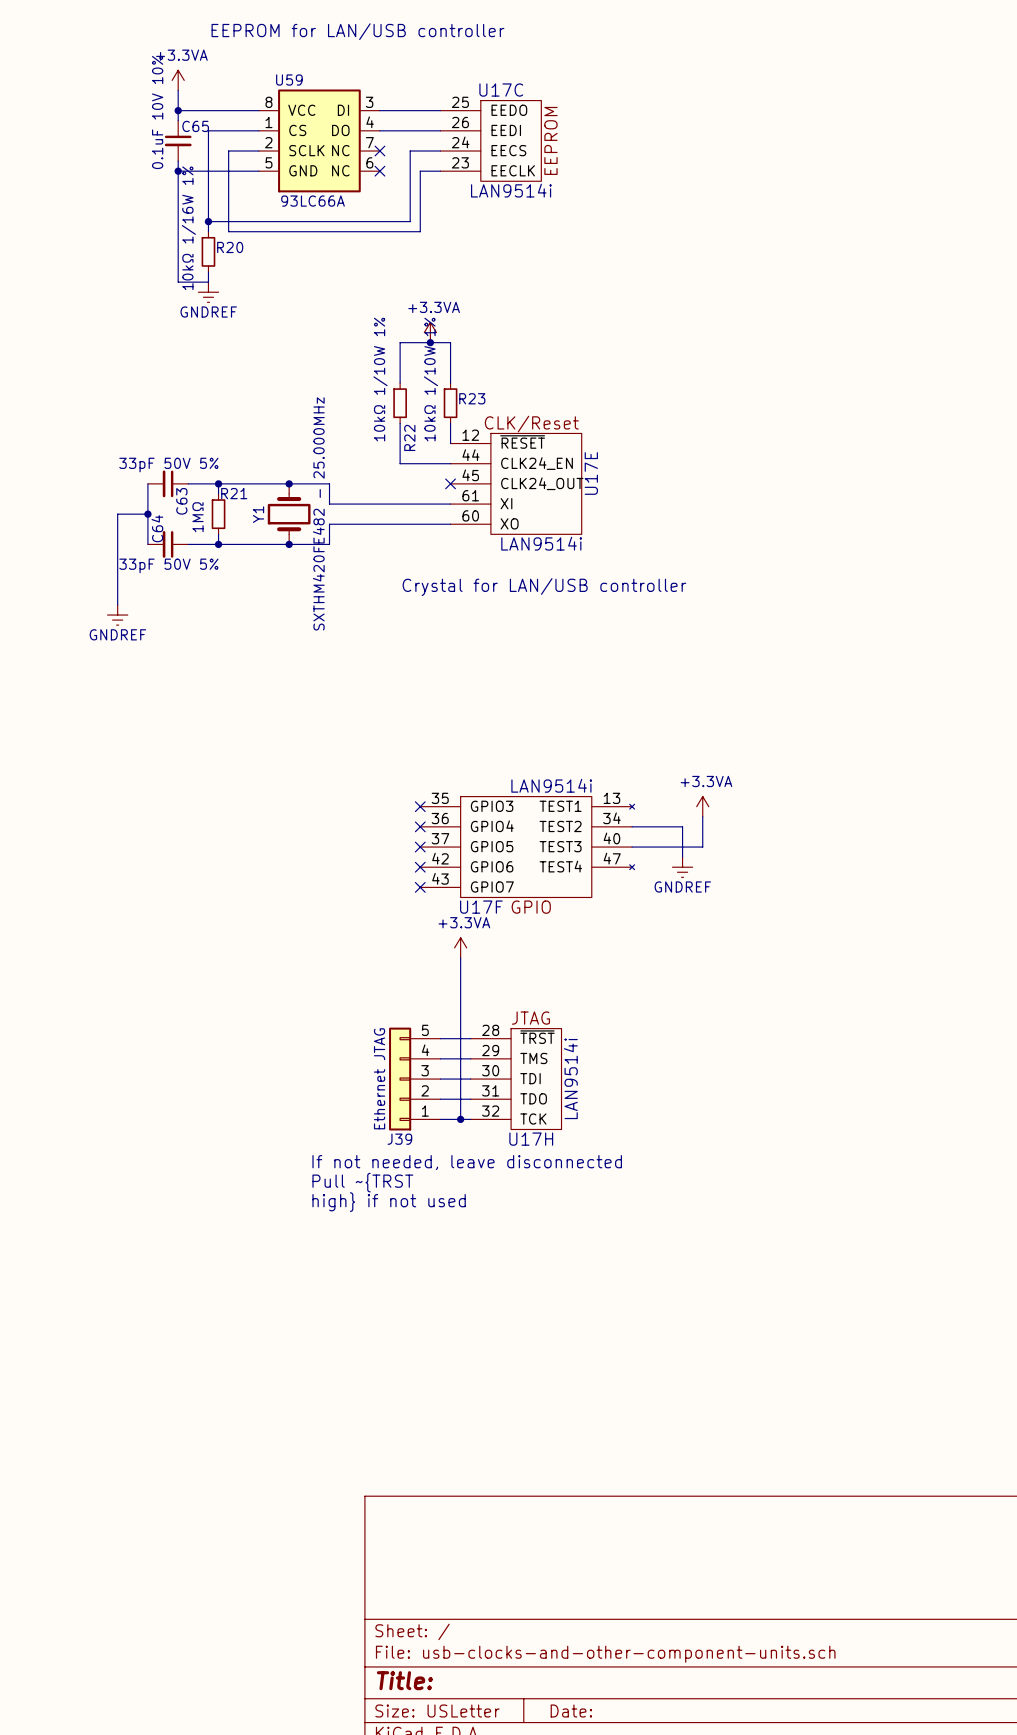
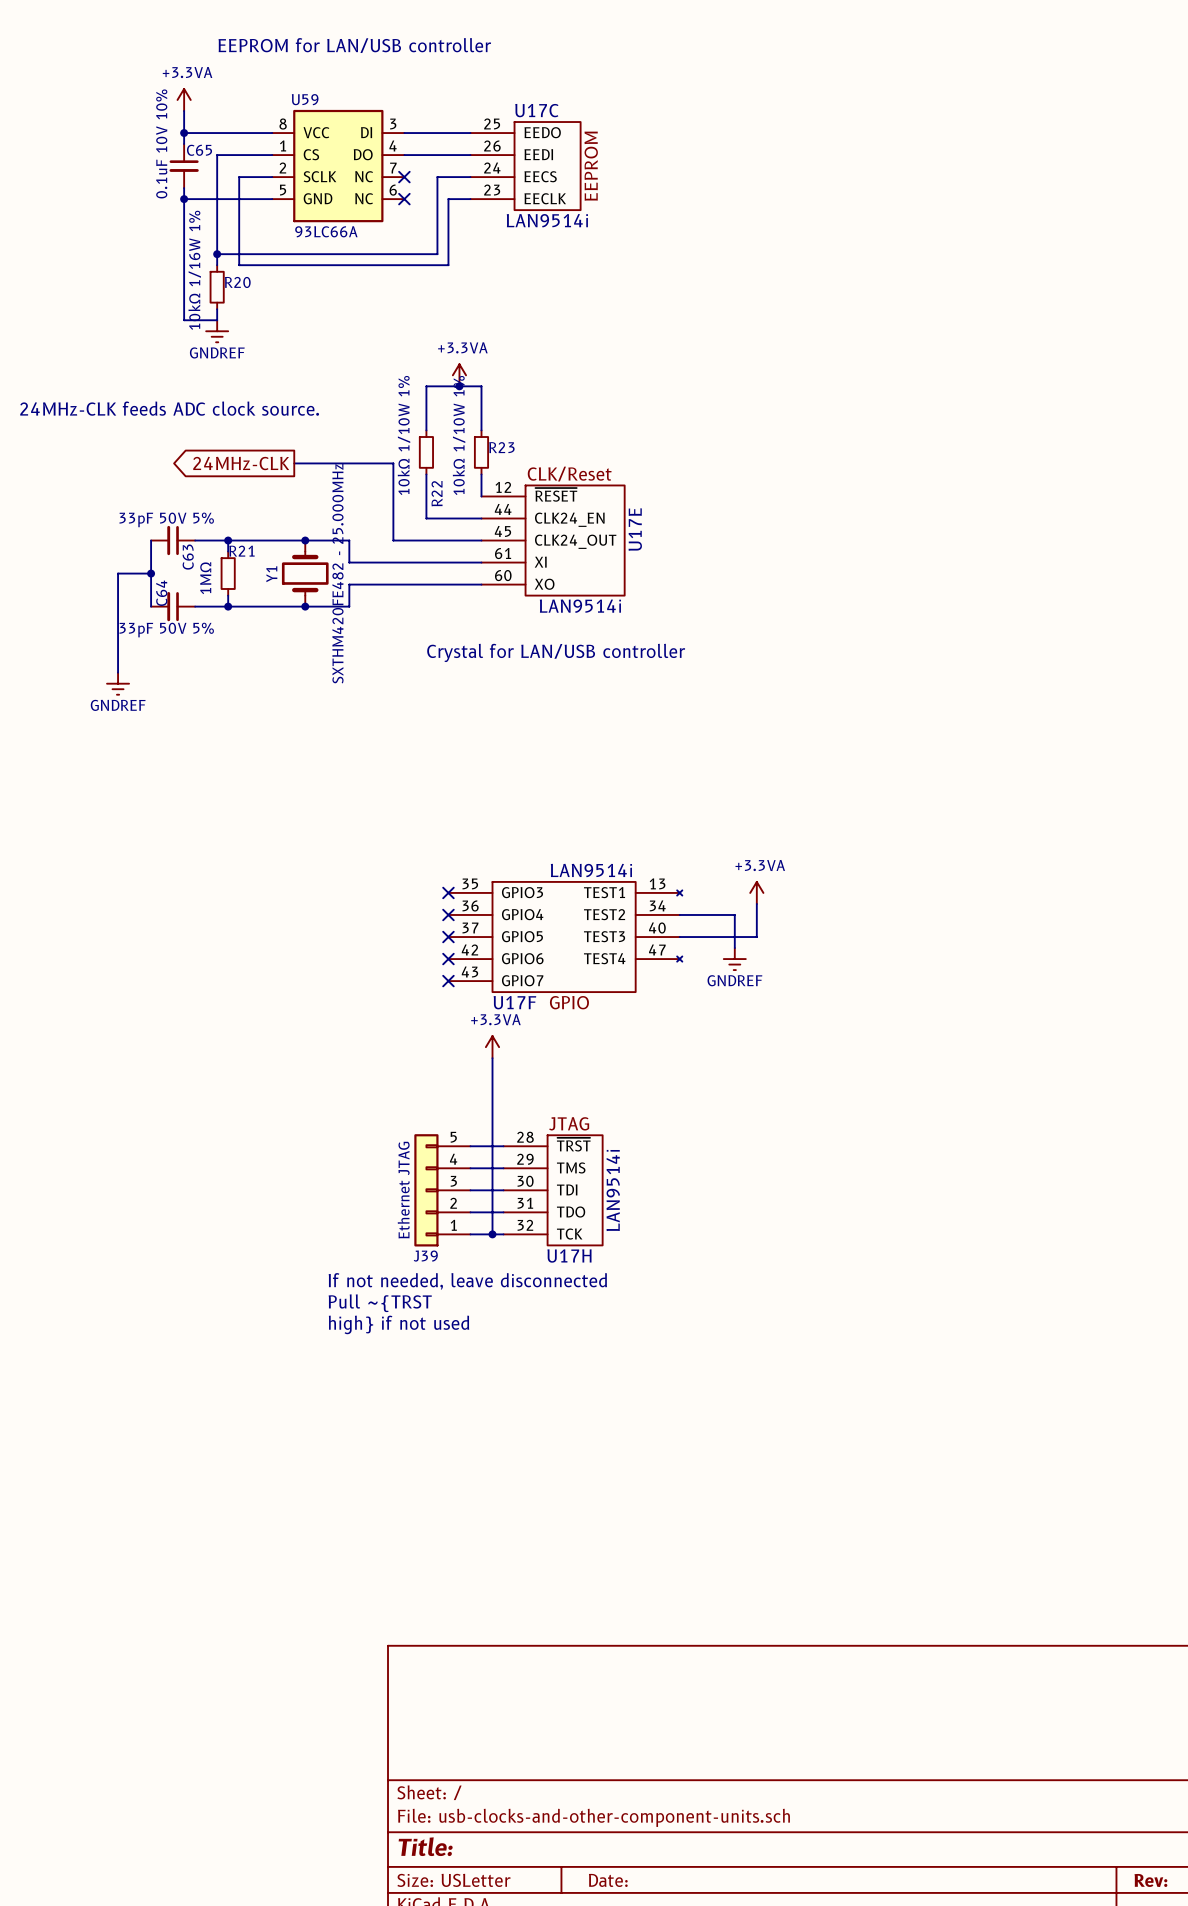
text: none -> 24MHz-CLK feeds ADC clock source. (169, 408)
global label: none -> 24MHz-CLK (241, 463)
wire: none -> (294, 463) (393, 463) (393, 540) (481, 540)
no-connect mark: (450, 483) -> none

